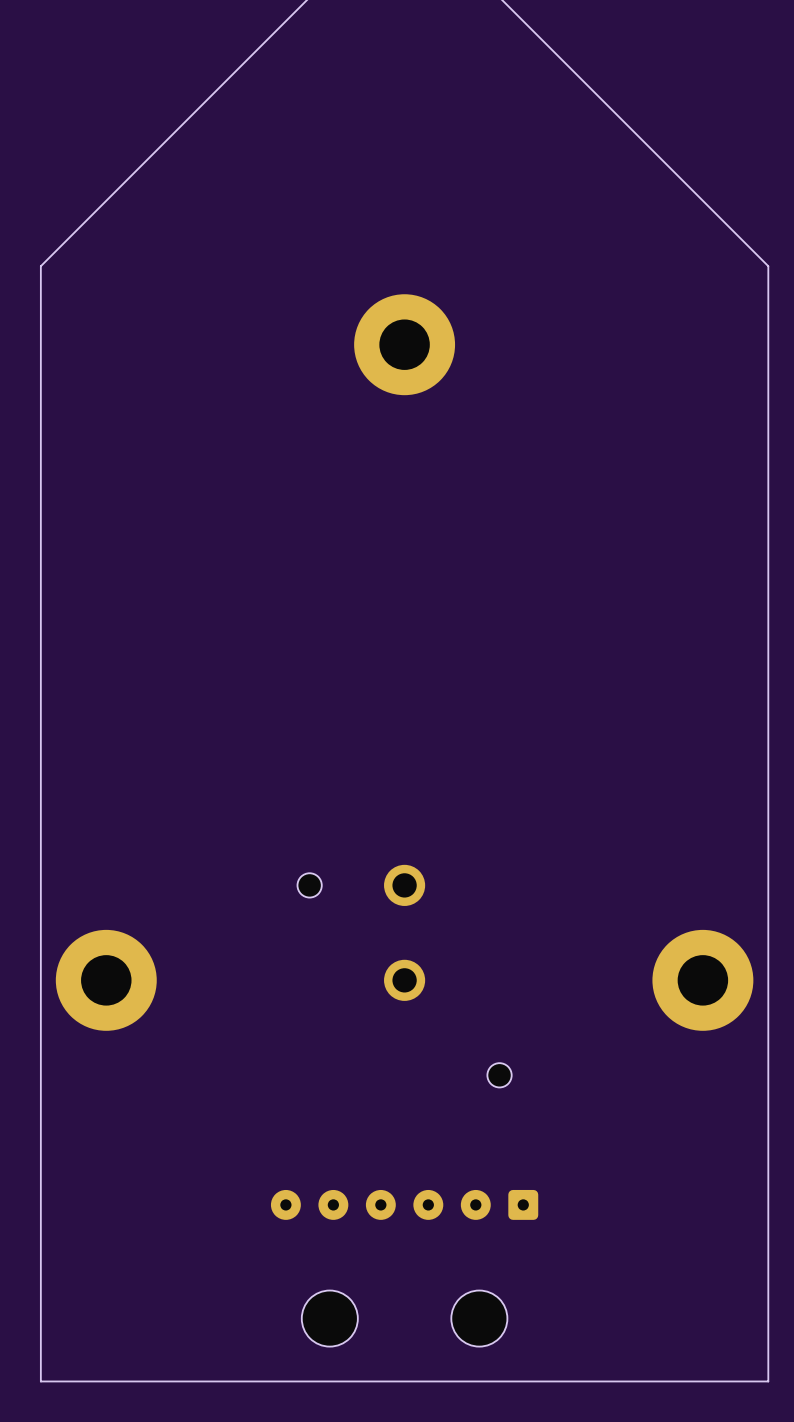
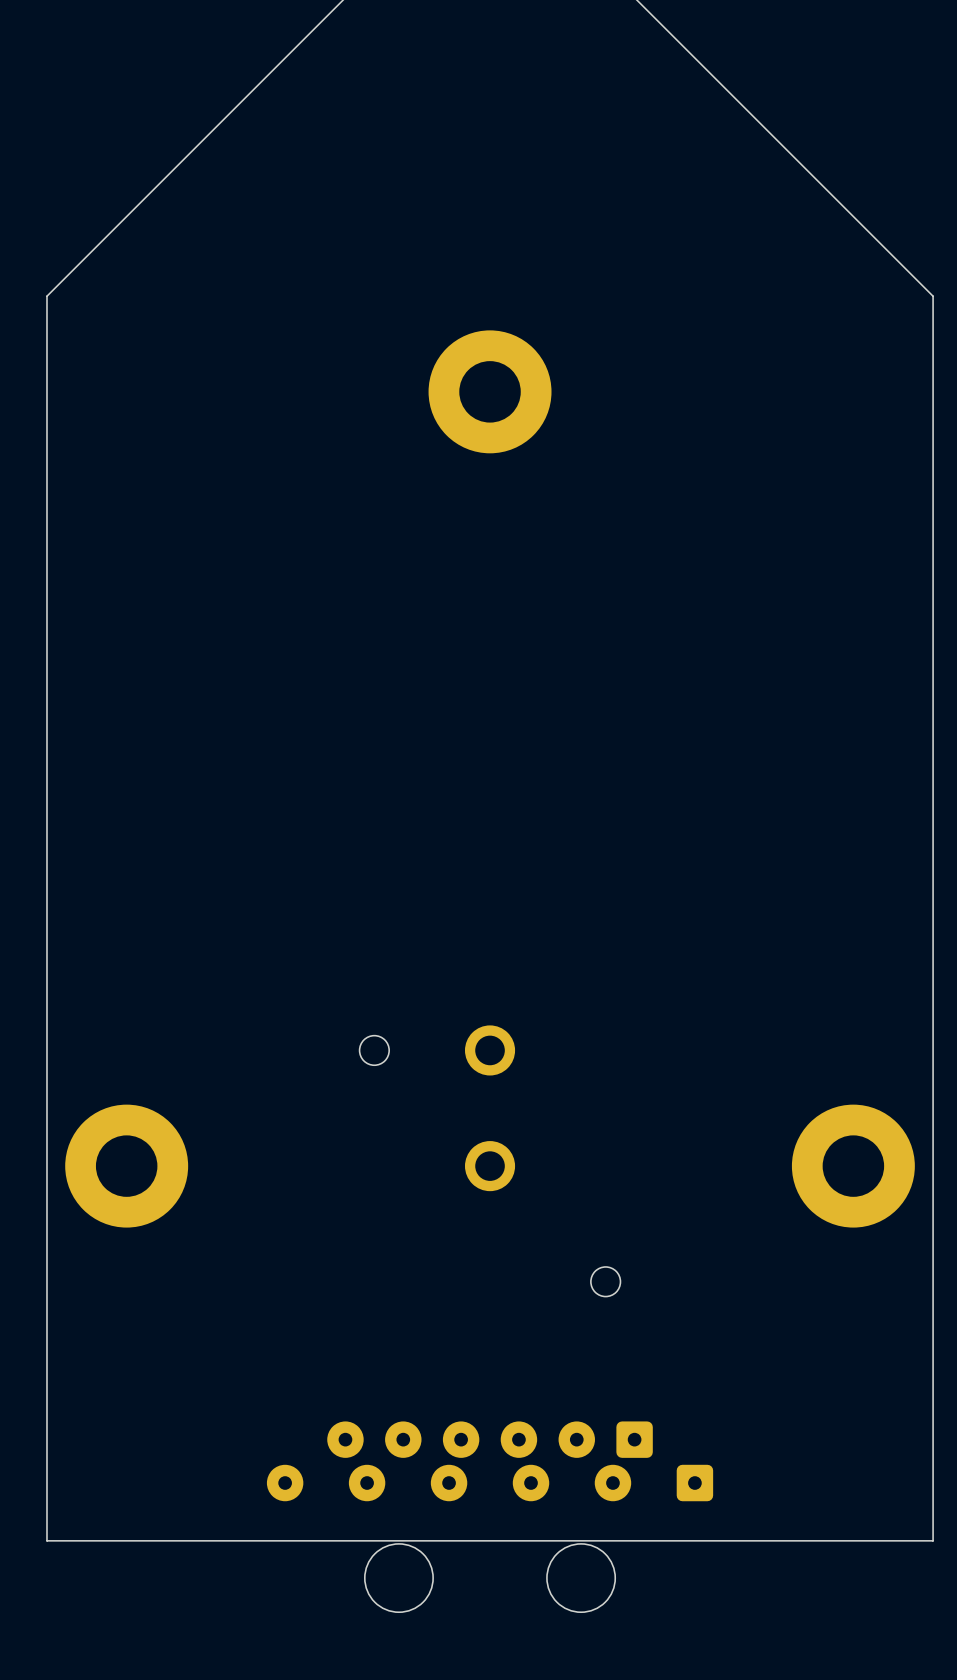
part: none -> (490, 1483)
board edge: (768, 1288) (768, 1381) (40, 1381) (40, 1288) -> (933, 1540) (46, 1540)

